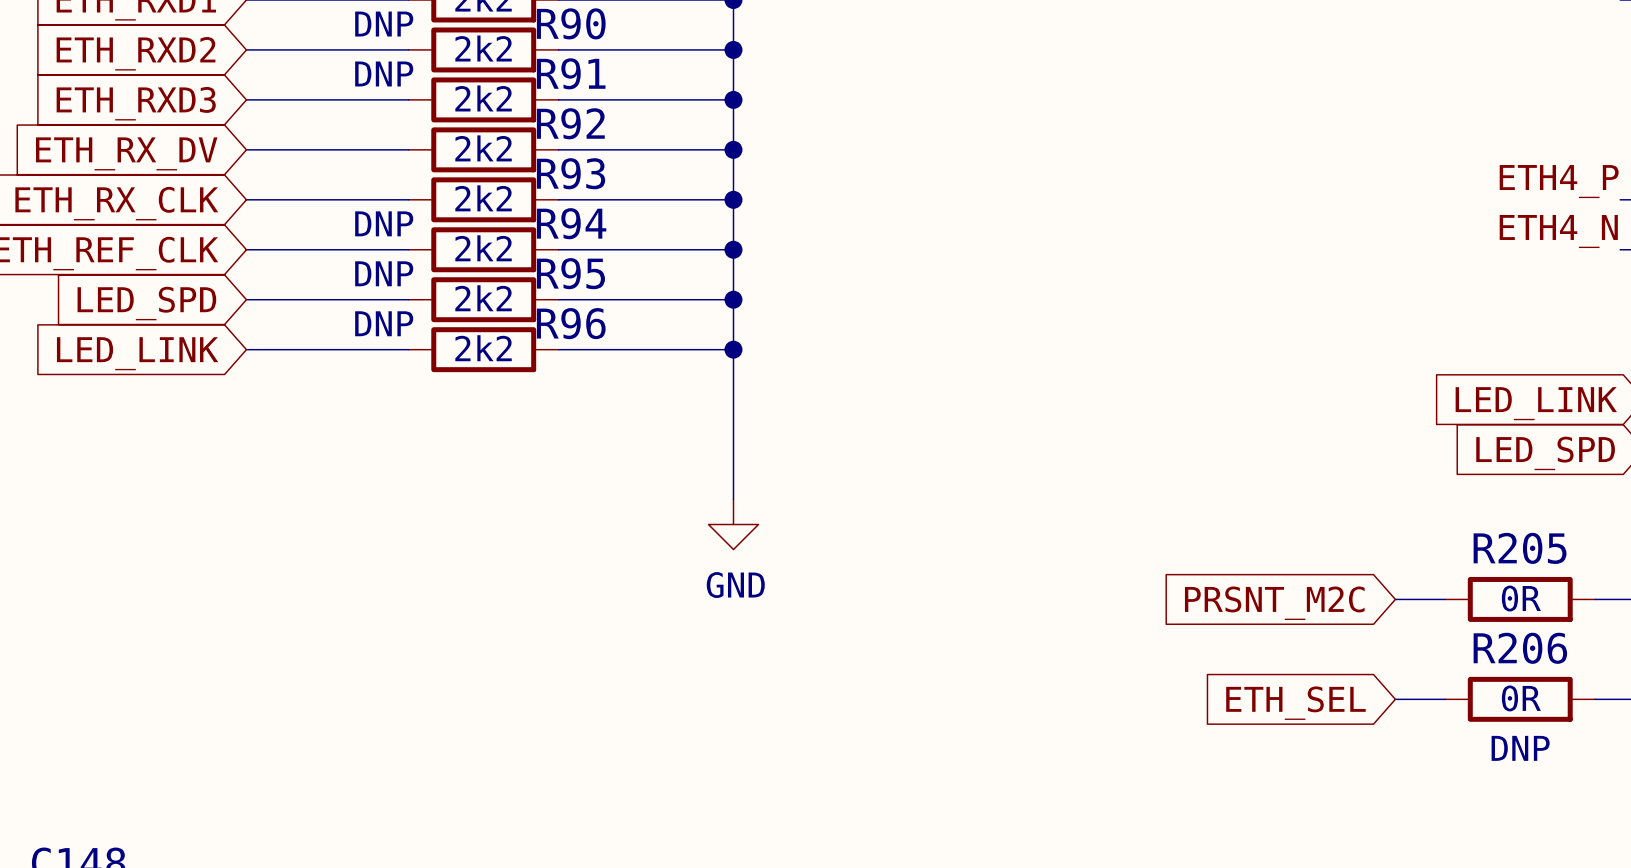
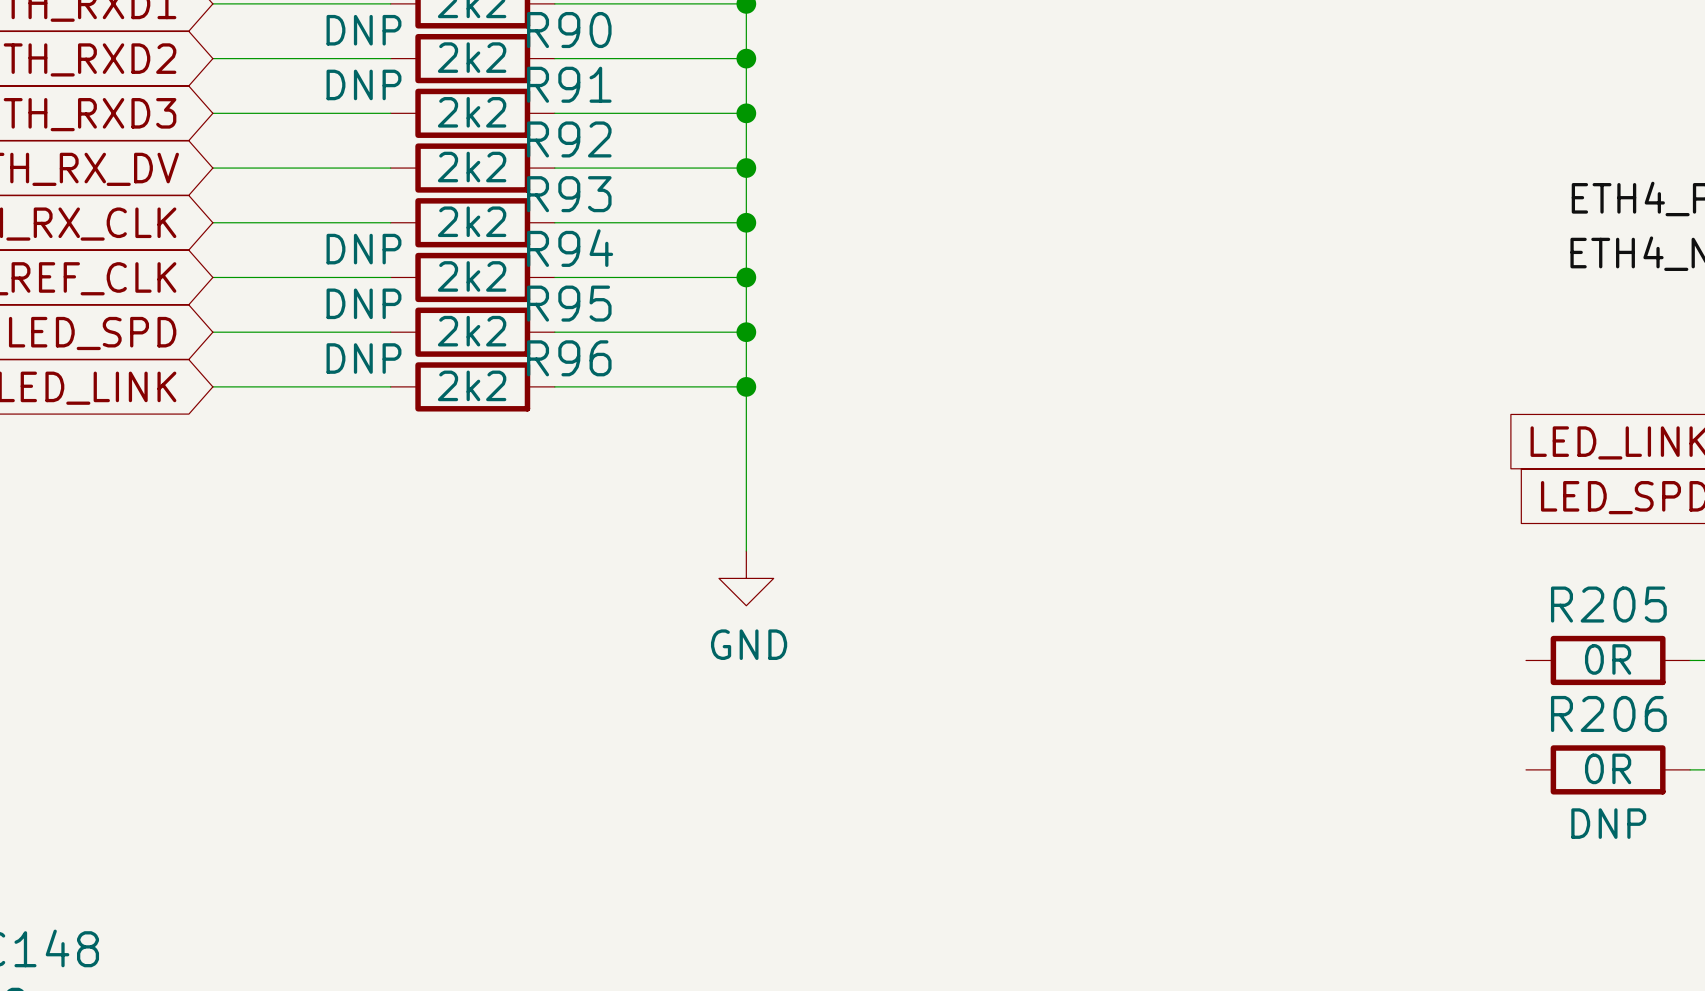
wire: (1395, 599) (1445, 599) -> none
global label: PRSNT_M2C (1274, 603) -> none
wire: (1395, 699) (1445, 699) -> none
global label: ETH_SEL (1295, 703) -> none

